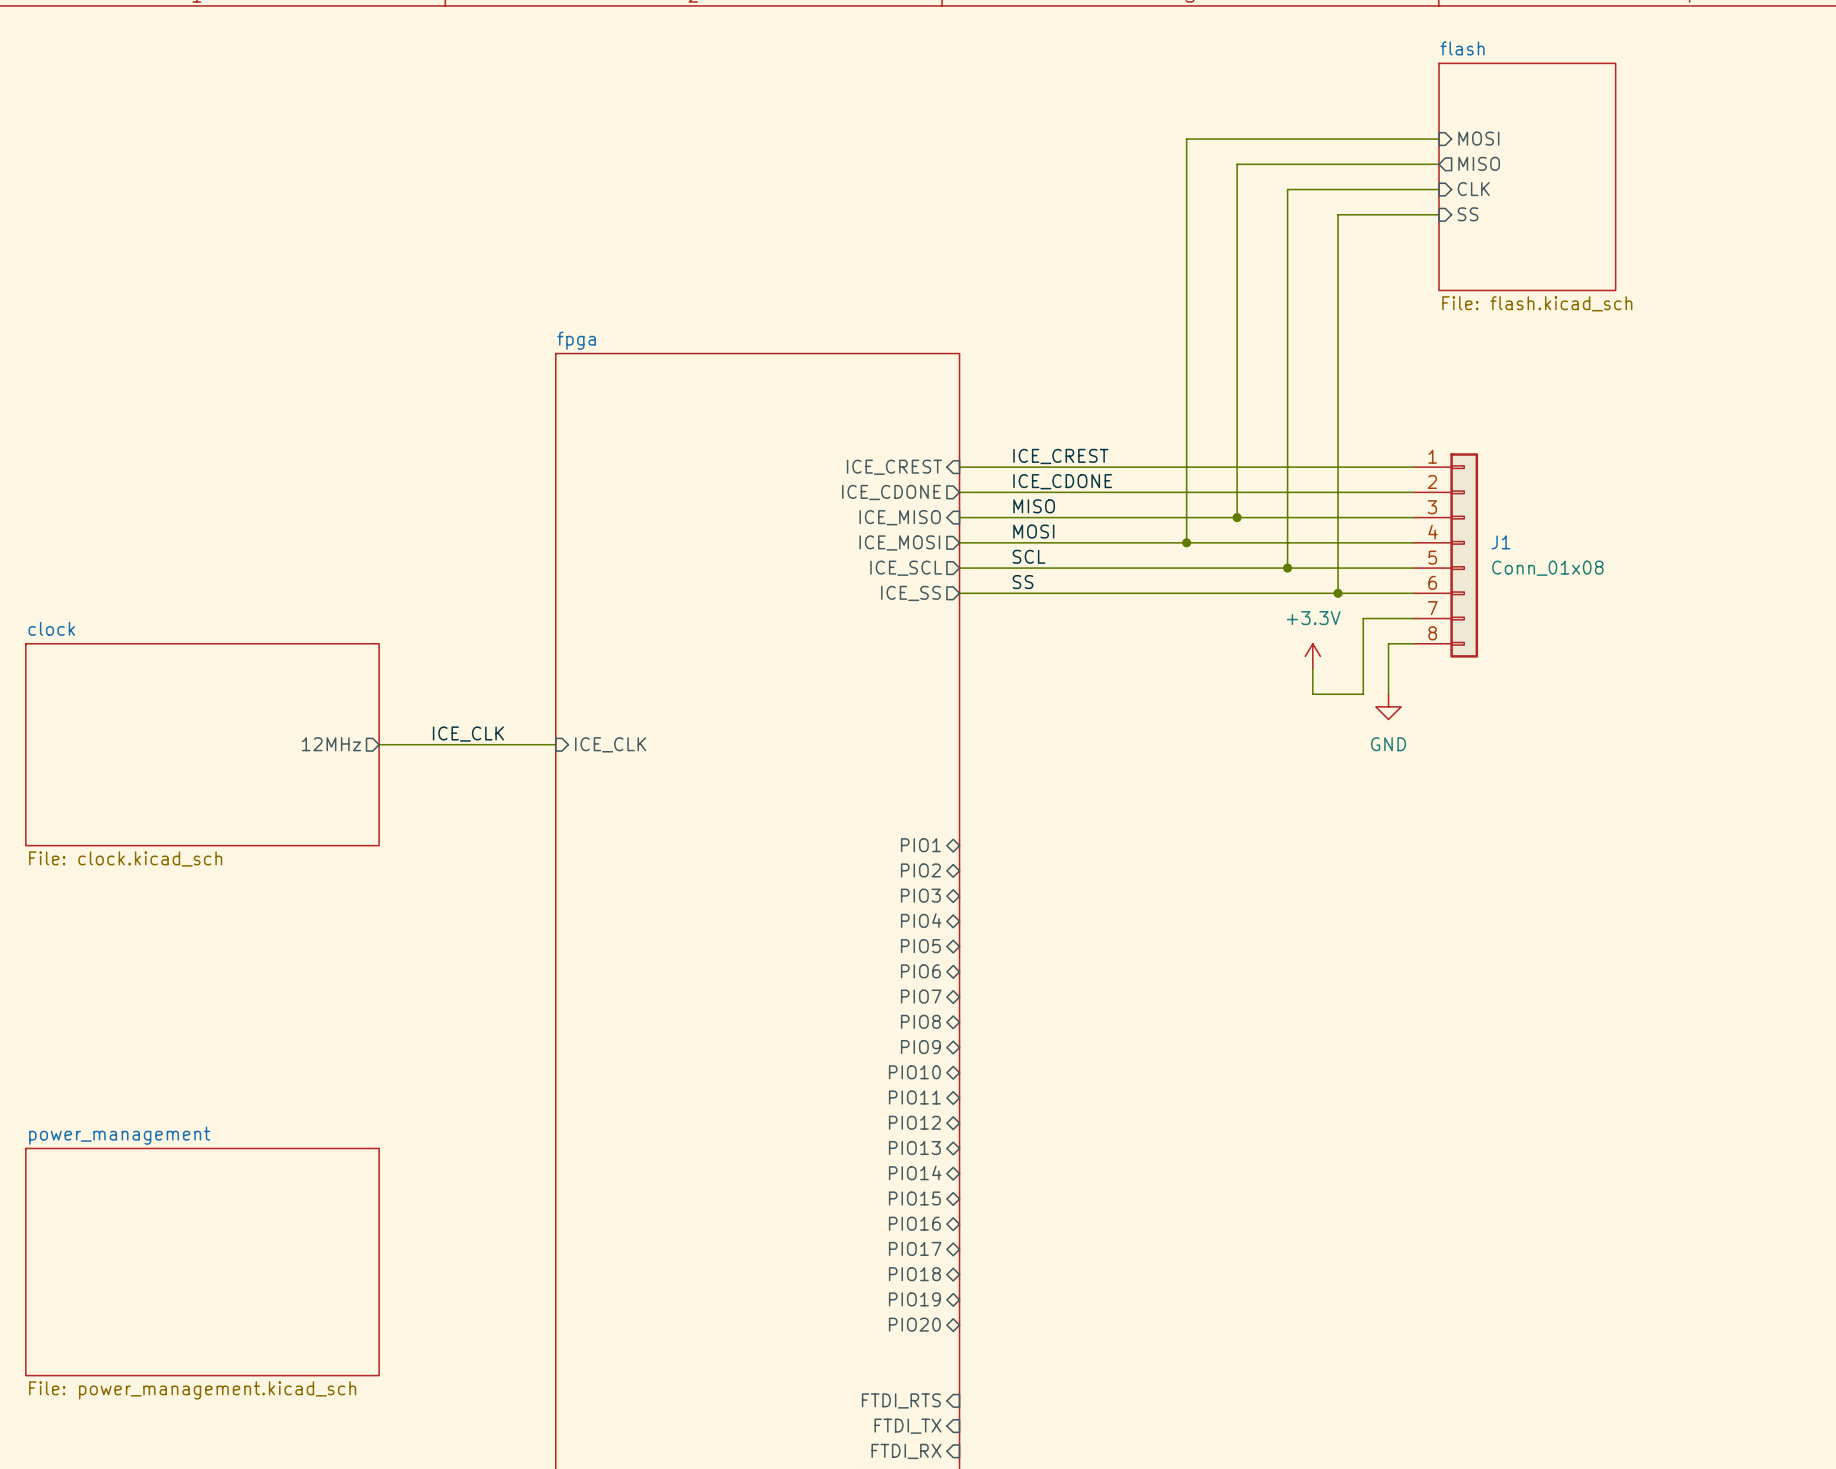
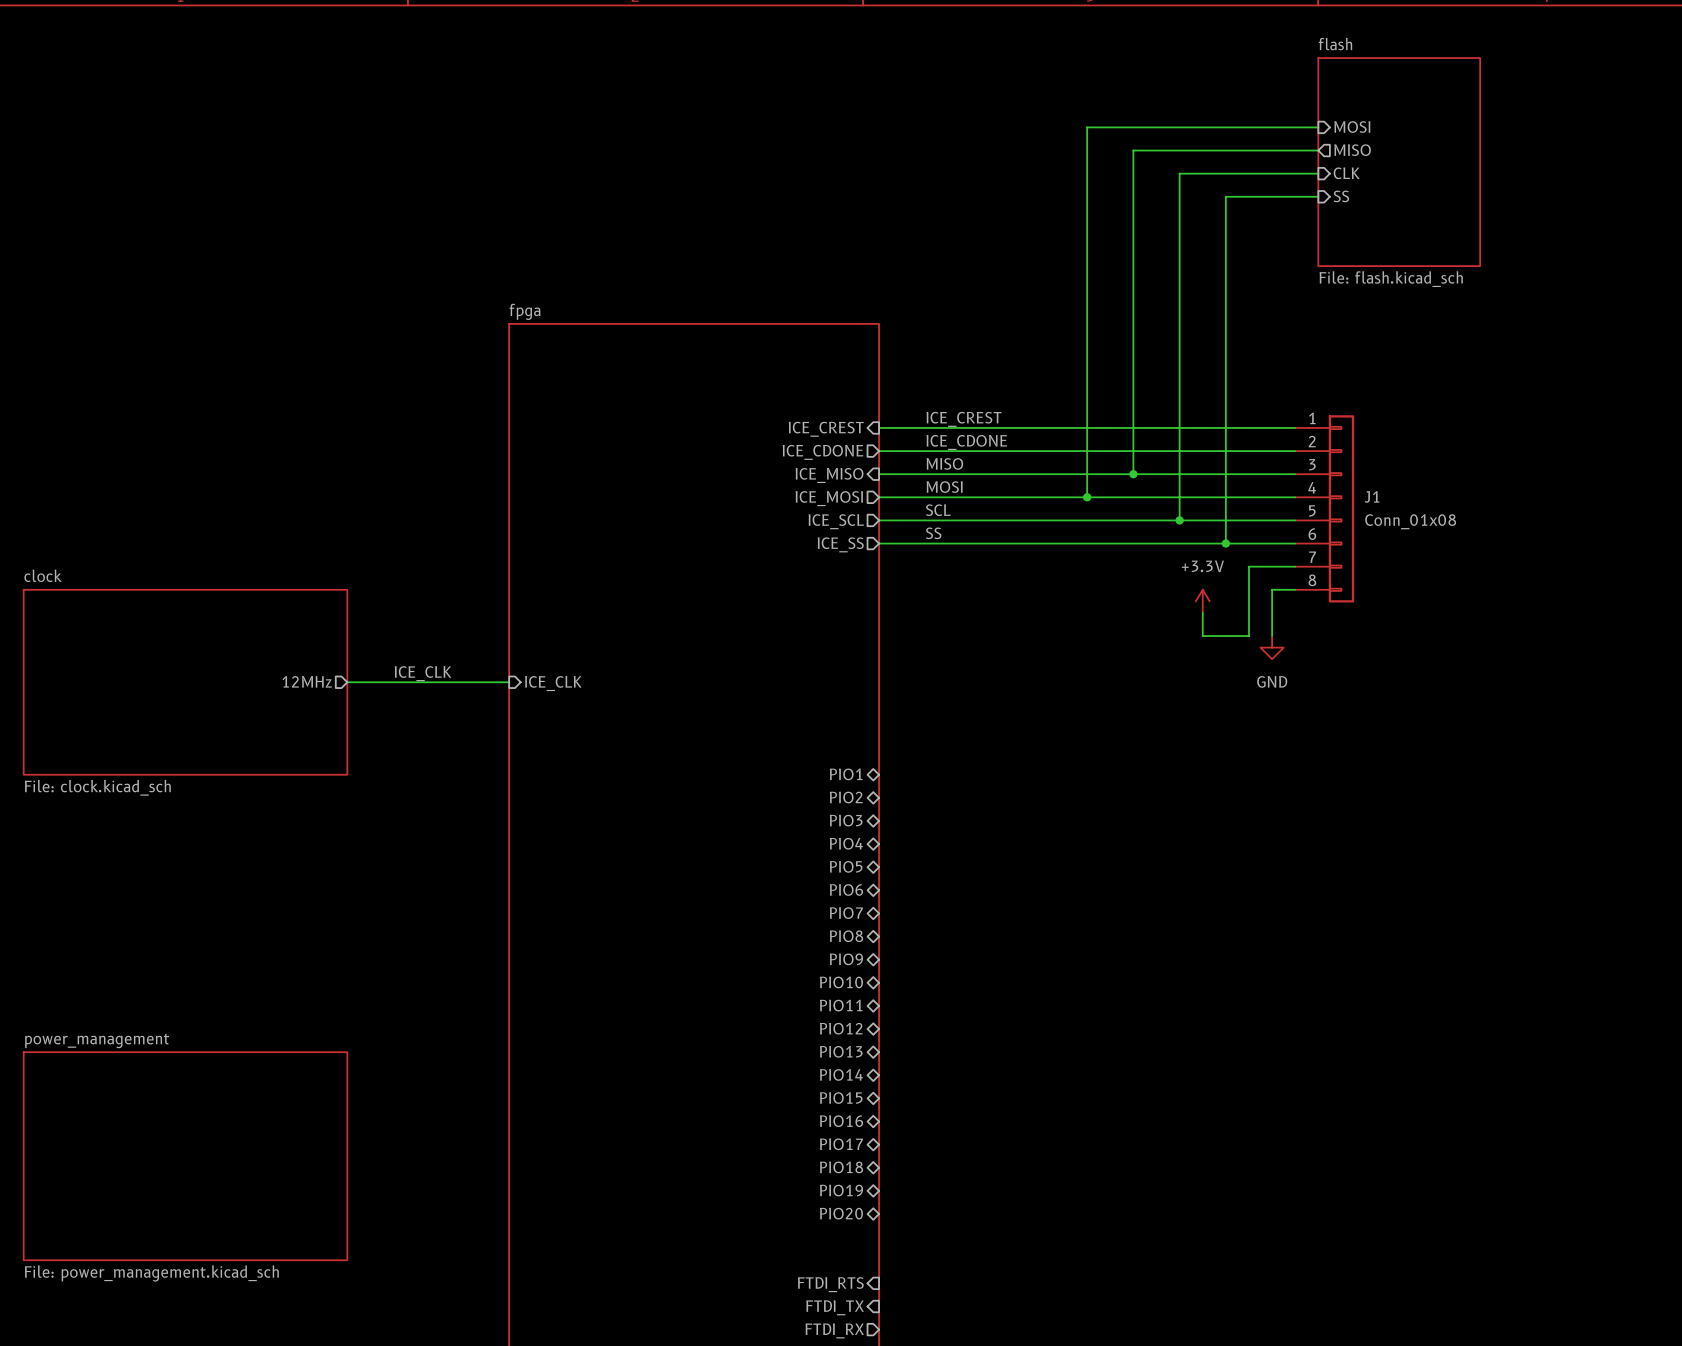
sheet pin shape: input (906, 1451) -> output (834, 1330)

